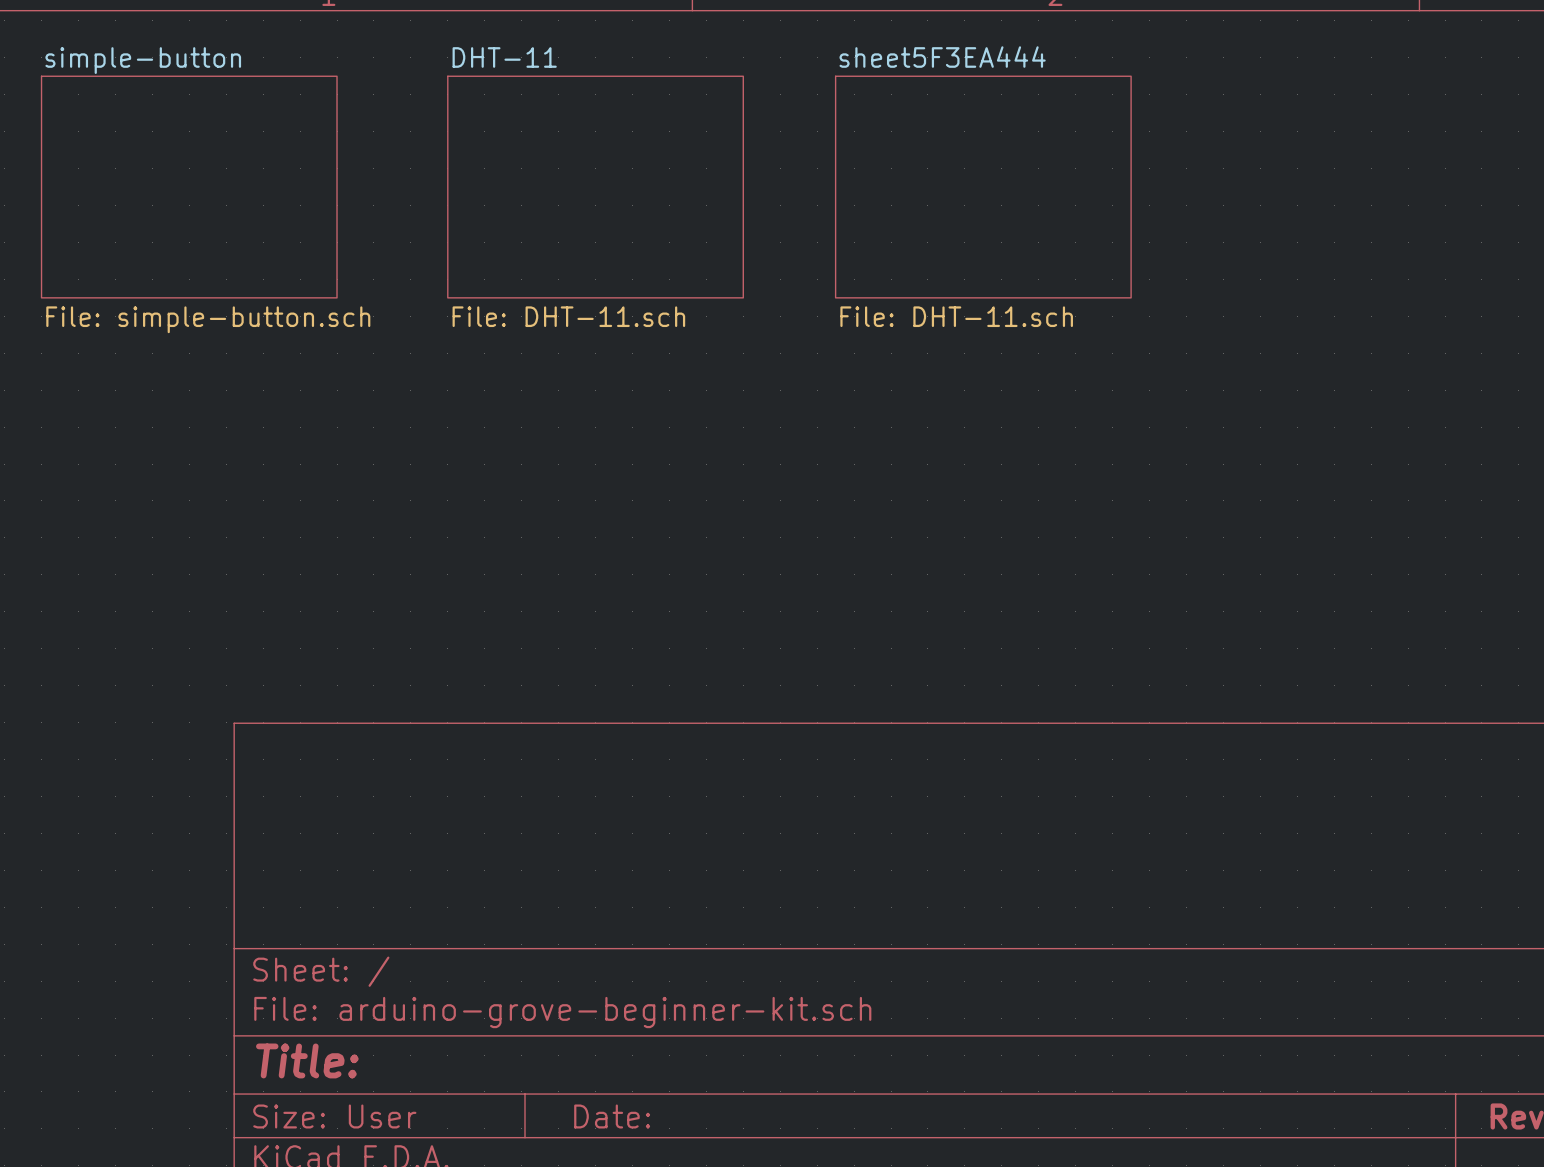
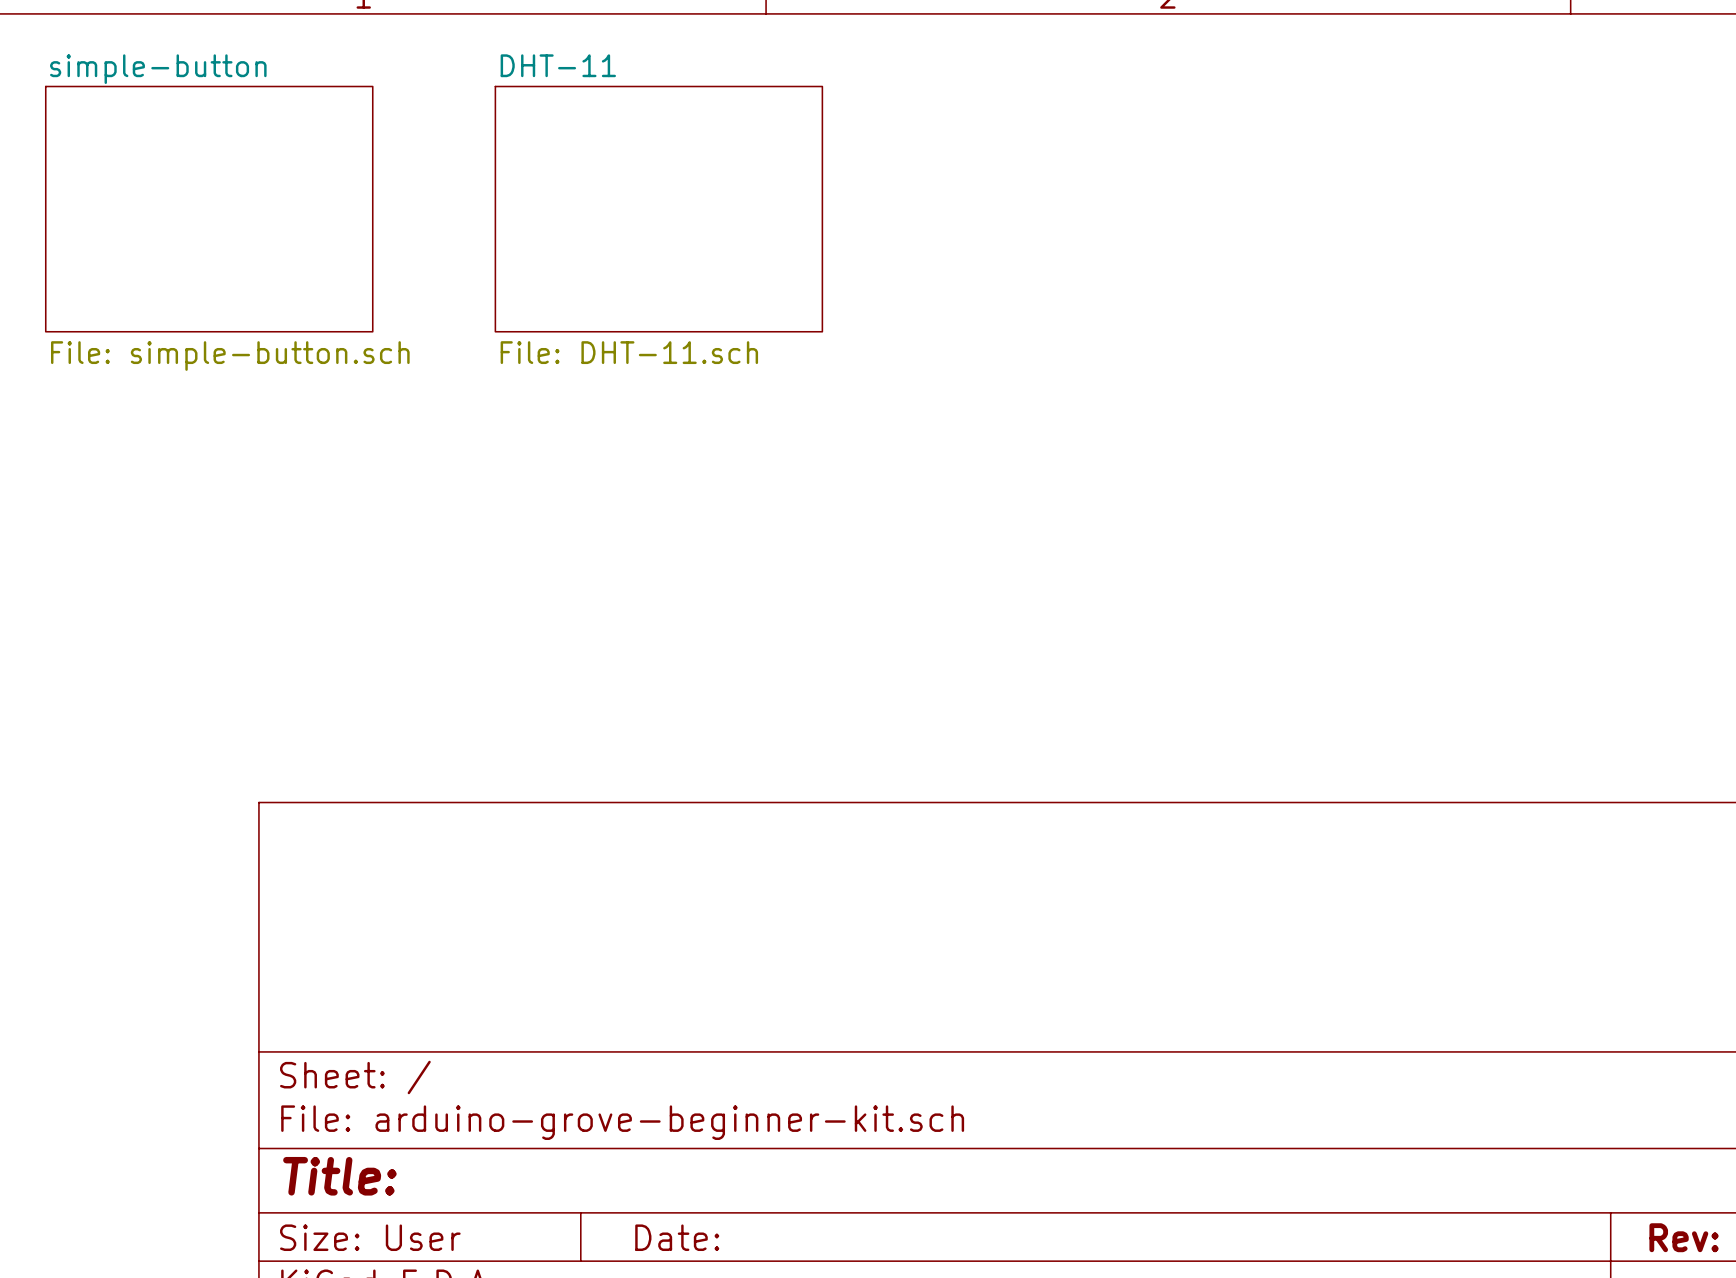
sheet sheet5F3EA444: File: DHT-11.sch (983, 187) -> none

